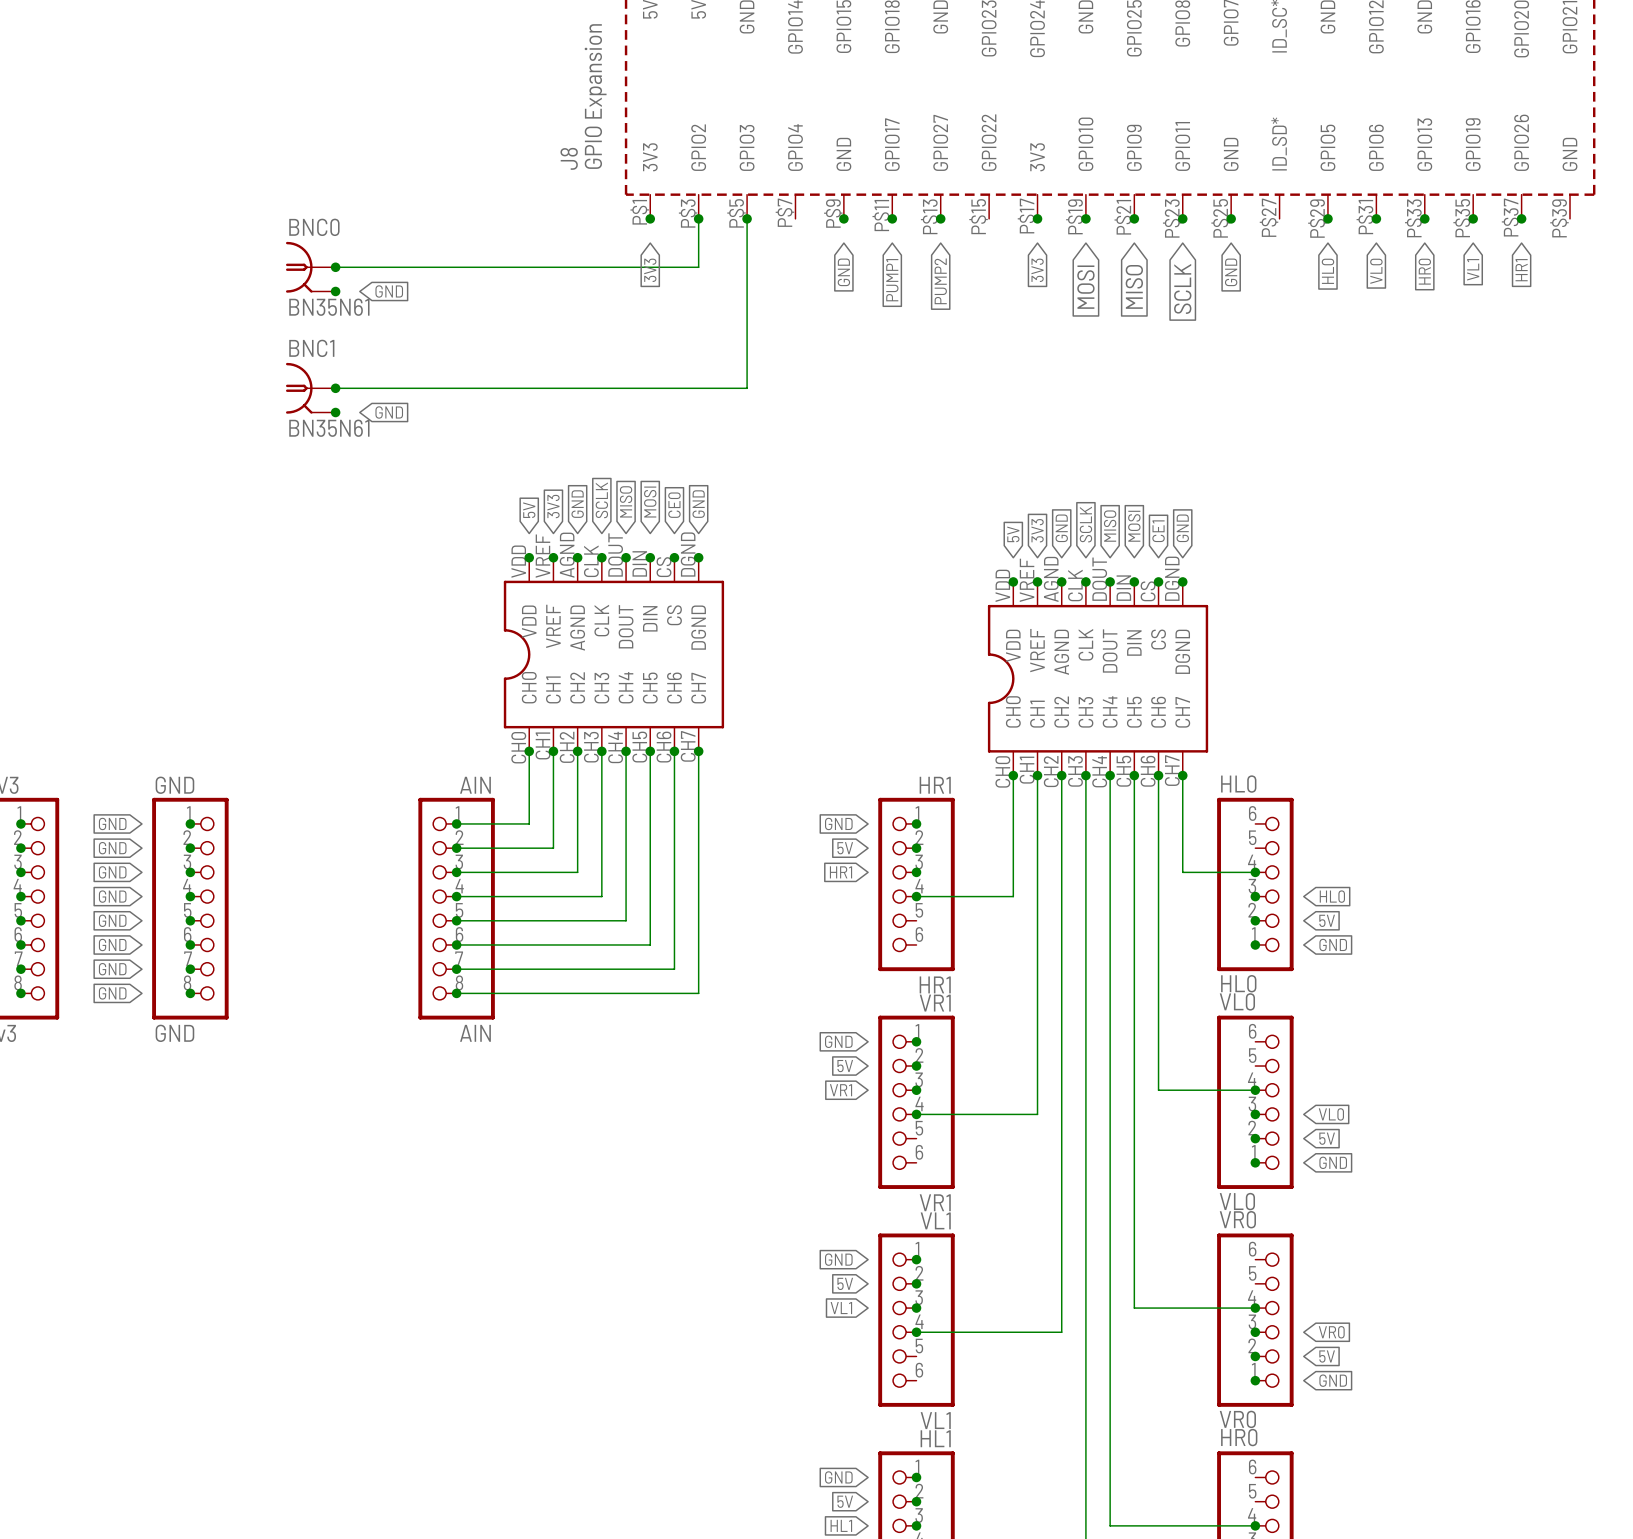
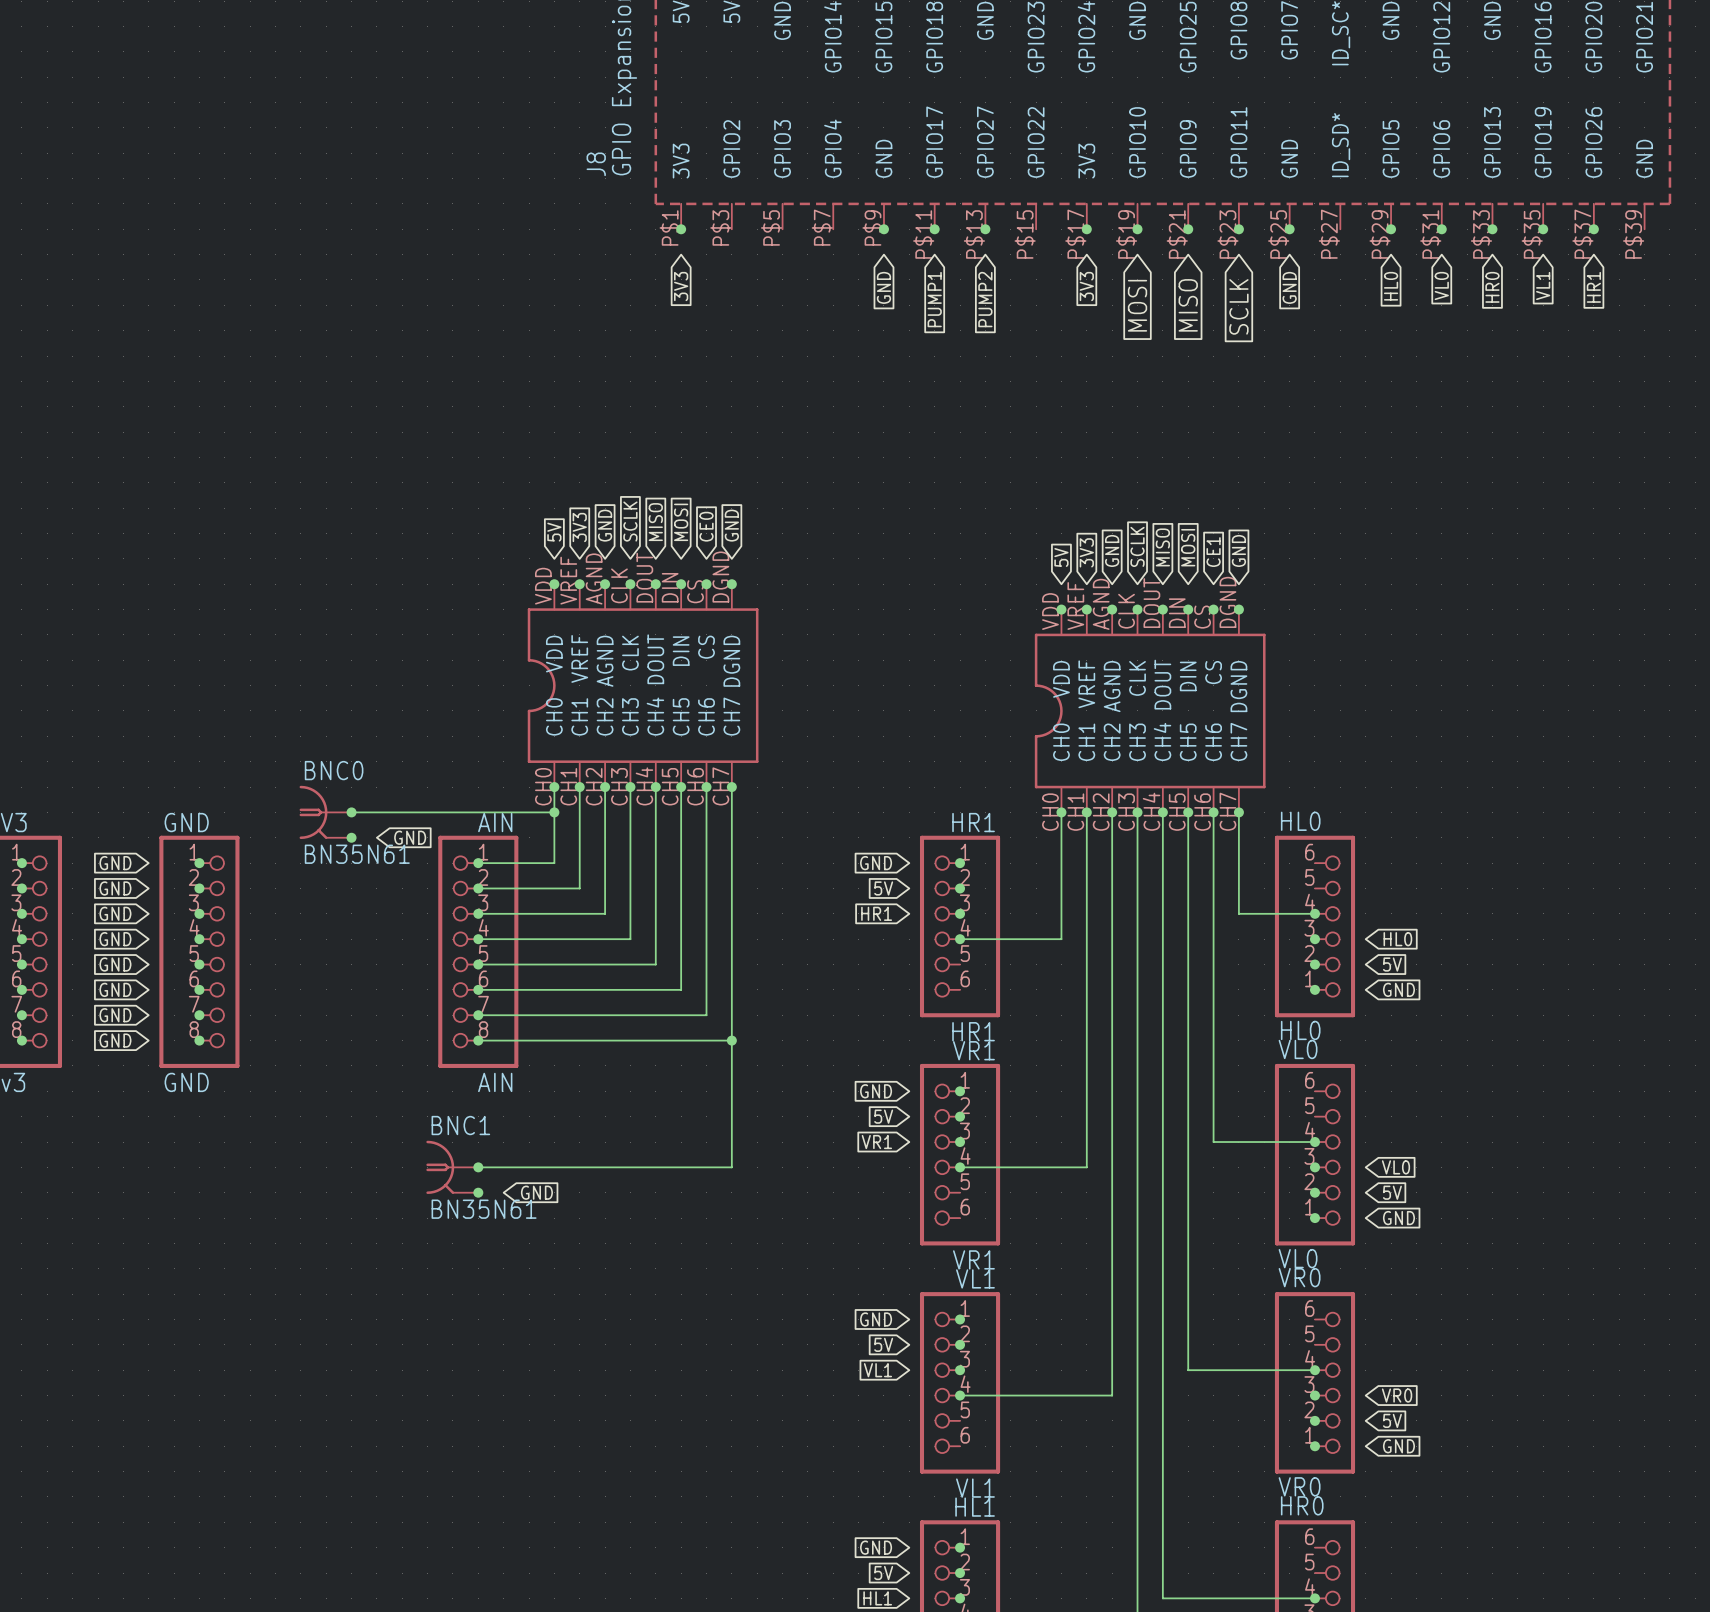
wire: (698, 218) (698, 267) (335, 267) -> none
junction: (698, 218) -> none
wire: (747, 218) (747, 388) (335, 388) -> none
junction: (747, 218) -> none
BNC0 position: (310, 267) -> (325, 812)
junction: (335, 267) -> none
junction: (335, 291) -> none
global label: GND (389, 291) -> none
BNC1 position: (310, 388) -> (452, 1167)
junction: (335, 388) -> none
junction: (335, 412) -> none
global label: GND (389, 412) -> none
wire: none -> (351, 812) (554, 812)
junction: none -> (351, 812)
junction: none -> (554, 812)
junction: none -> (351, 837)
global label: none -> GND (410, 837)
wire: none -> (731, 1040) (731, 1167) (478, 1167)
junction: none -> (731, 1040)
junction: none -> (478, 1167)
junction: none -> (478, 1192)
global label: none -> GND (536, 1192)

